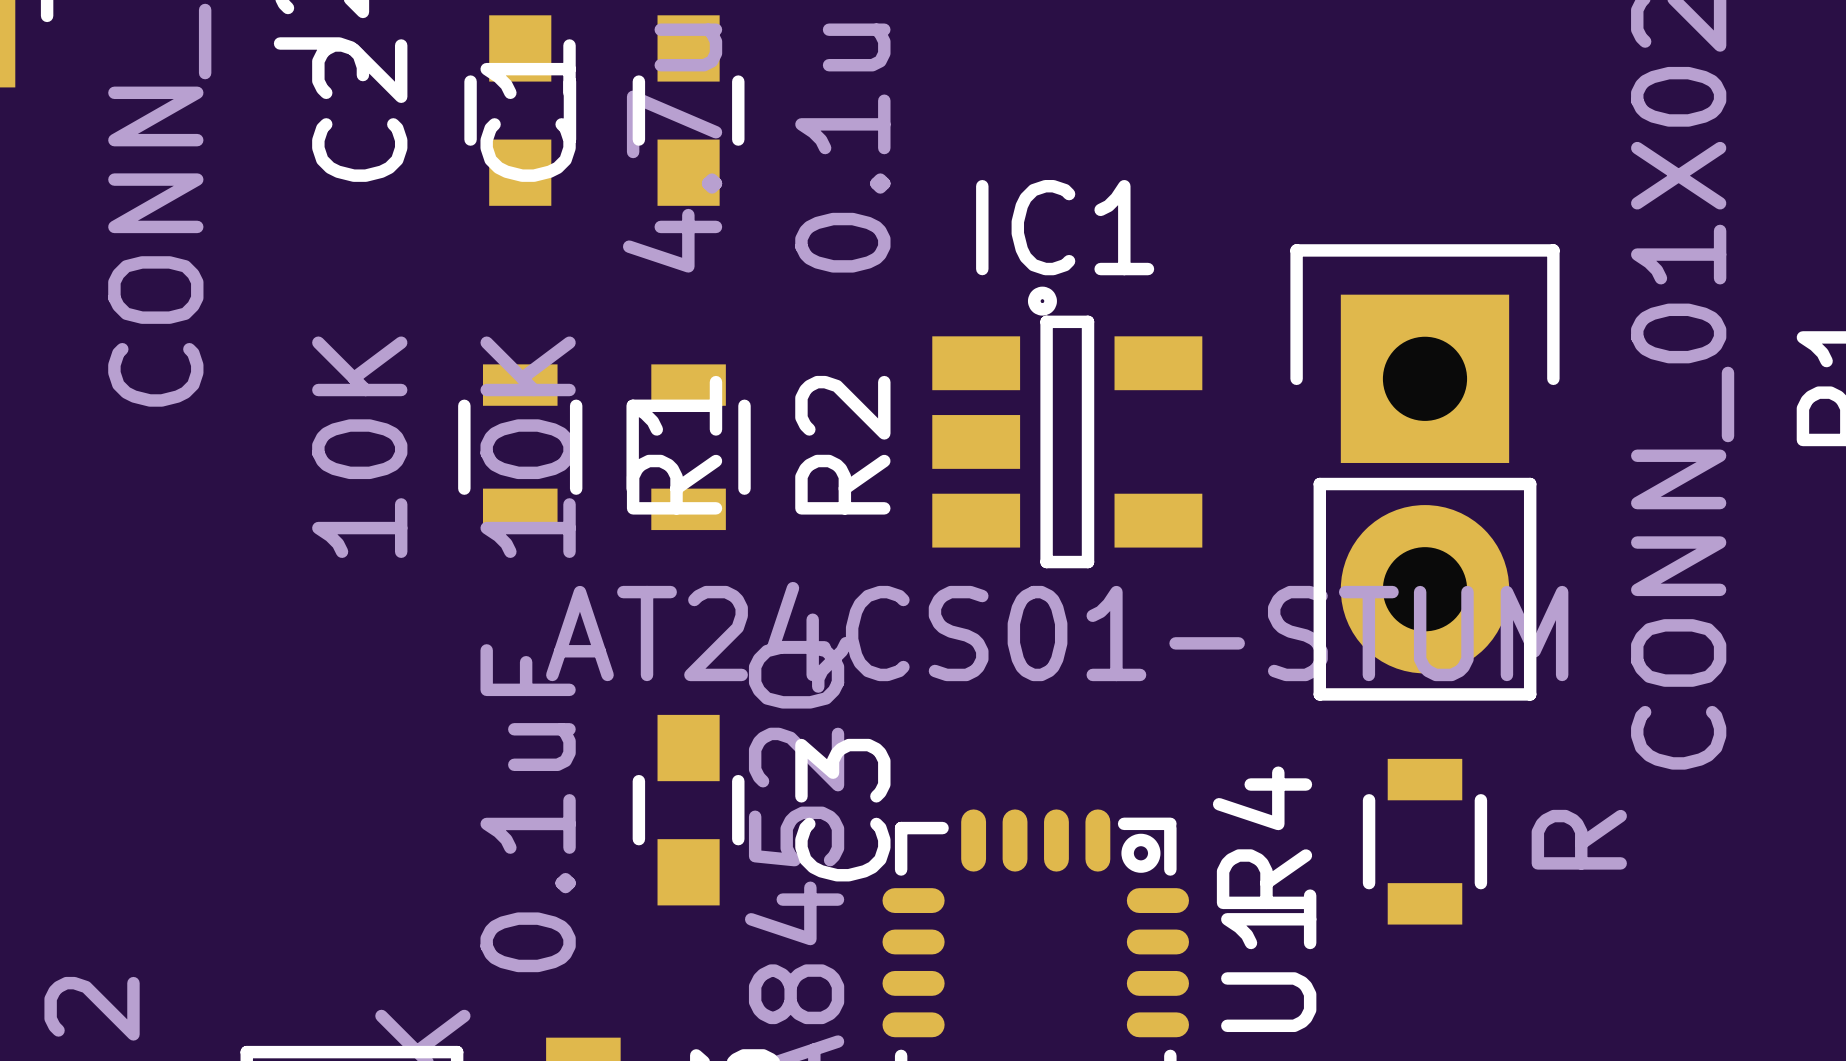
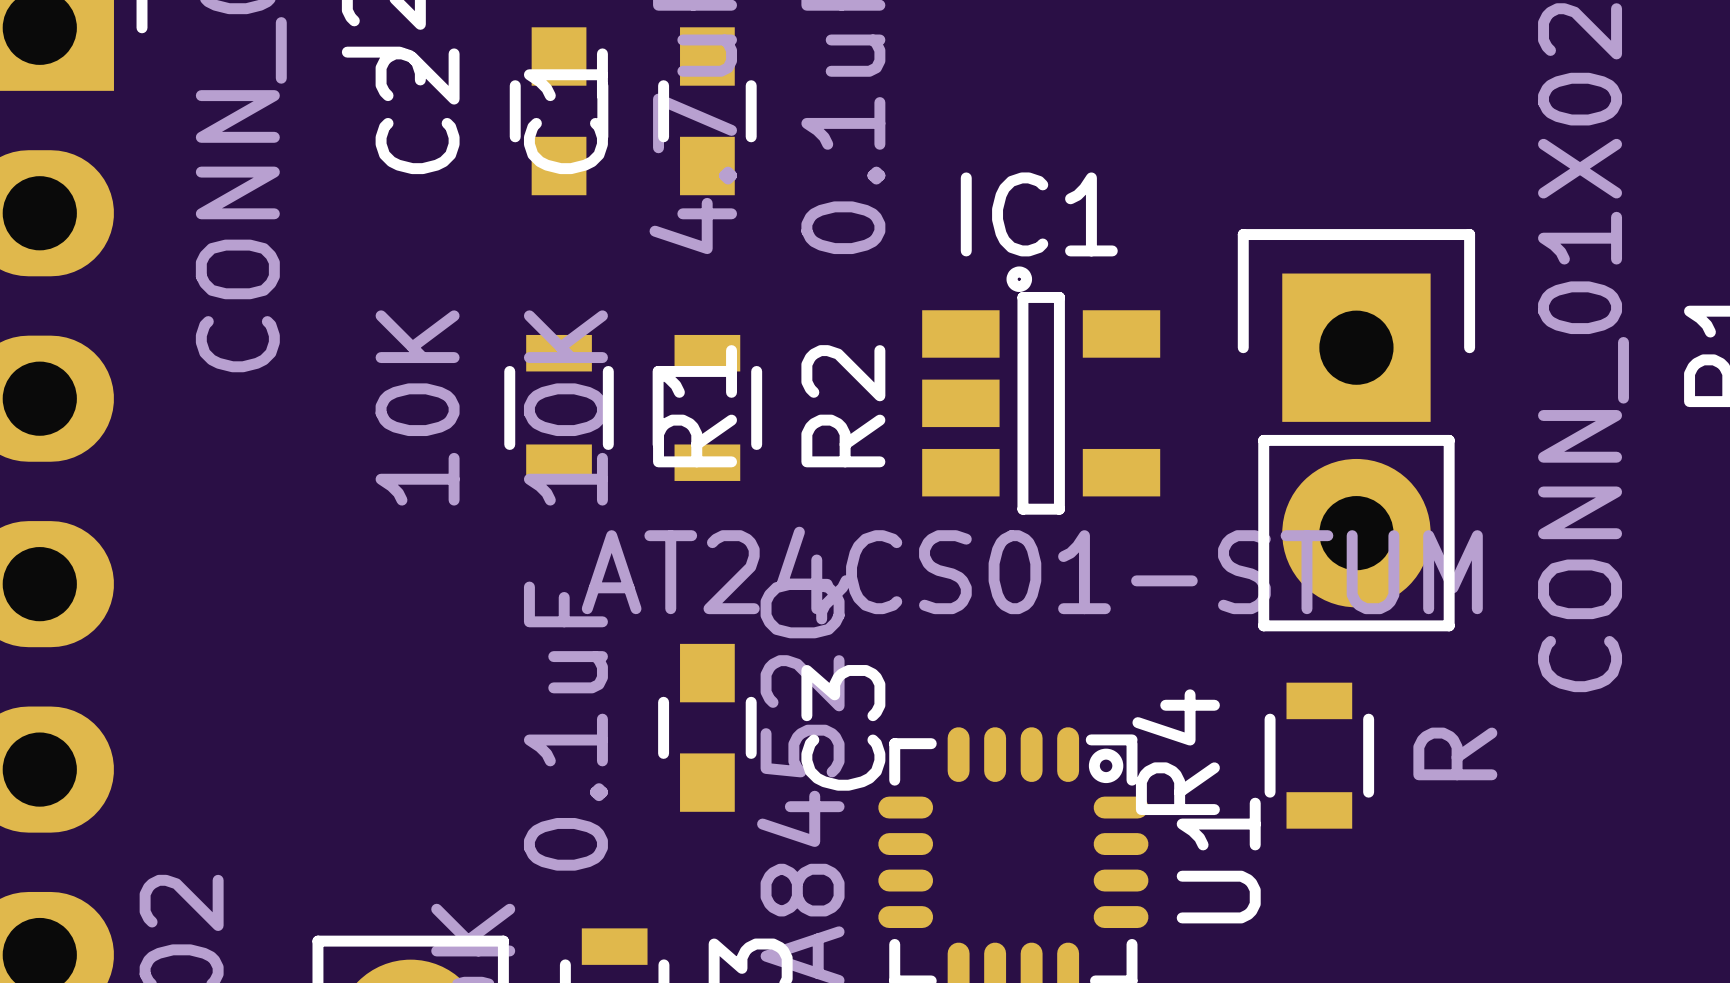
R4 position: (1424, 841) -> (1319, 755)

